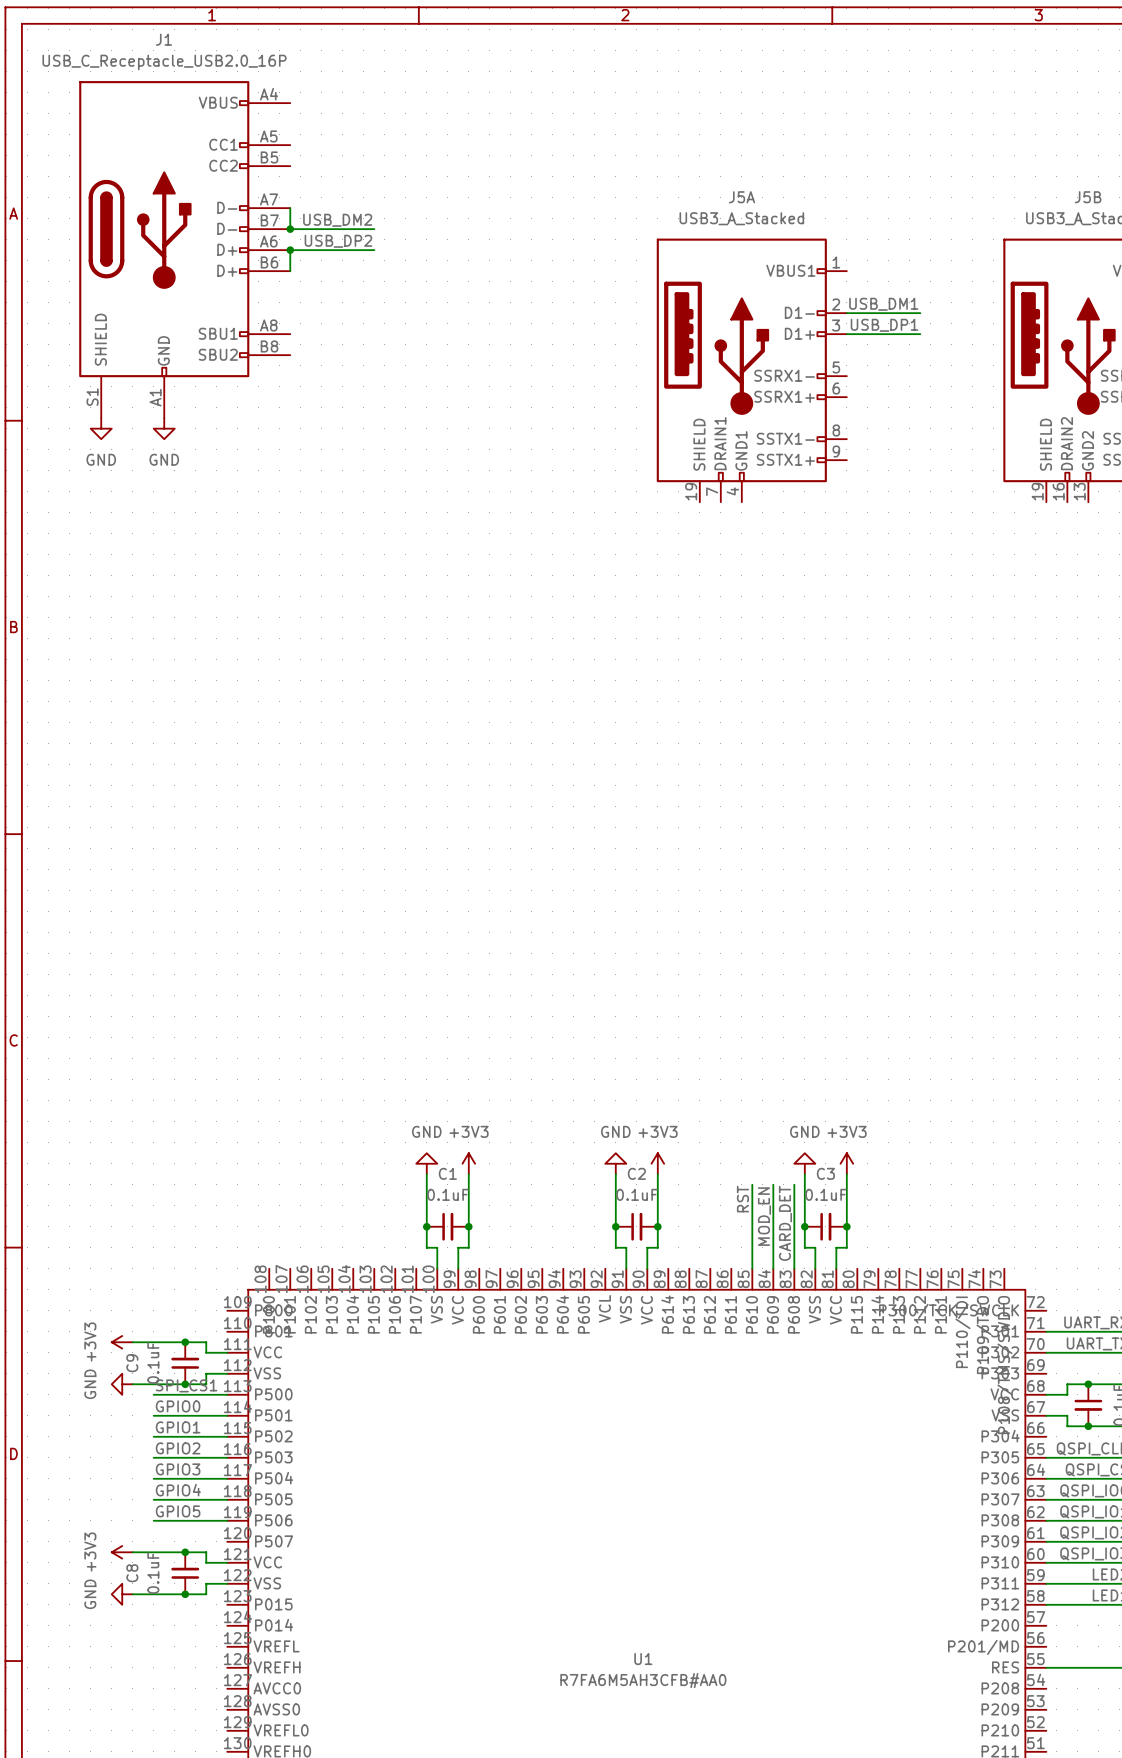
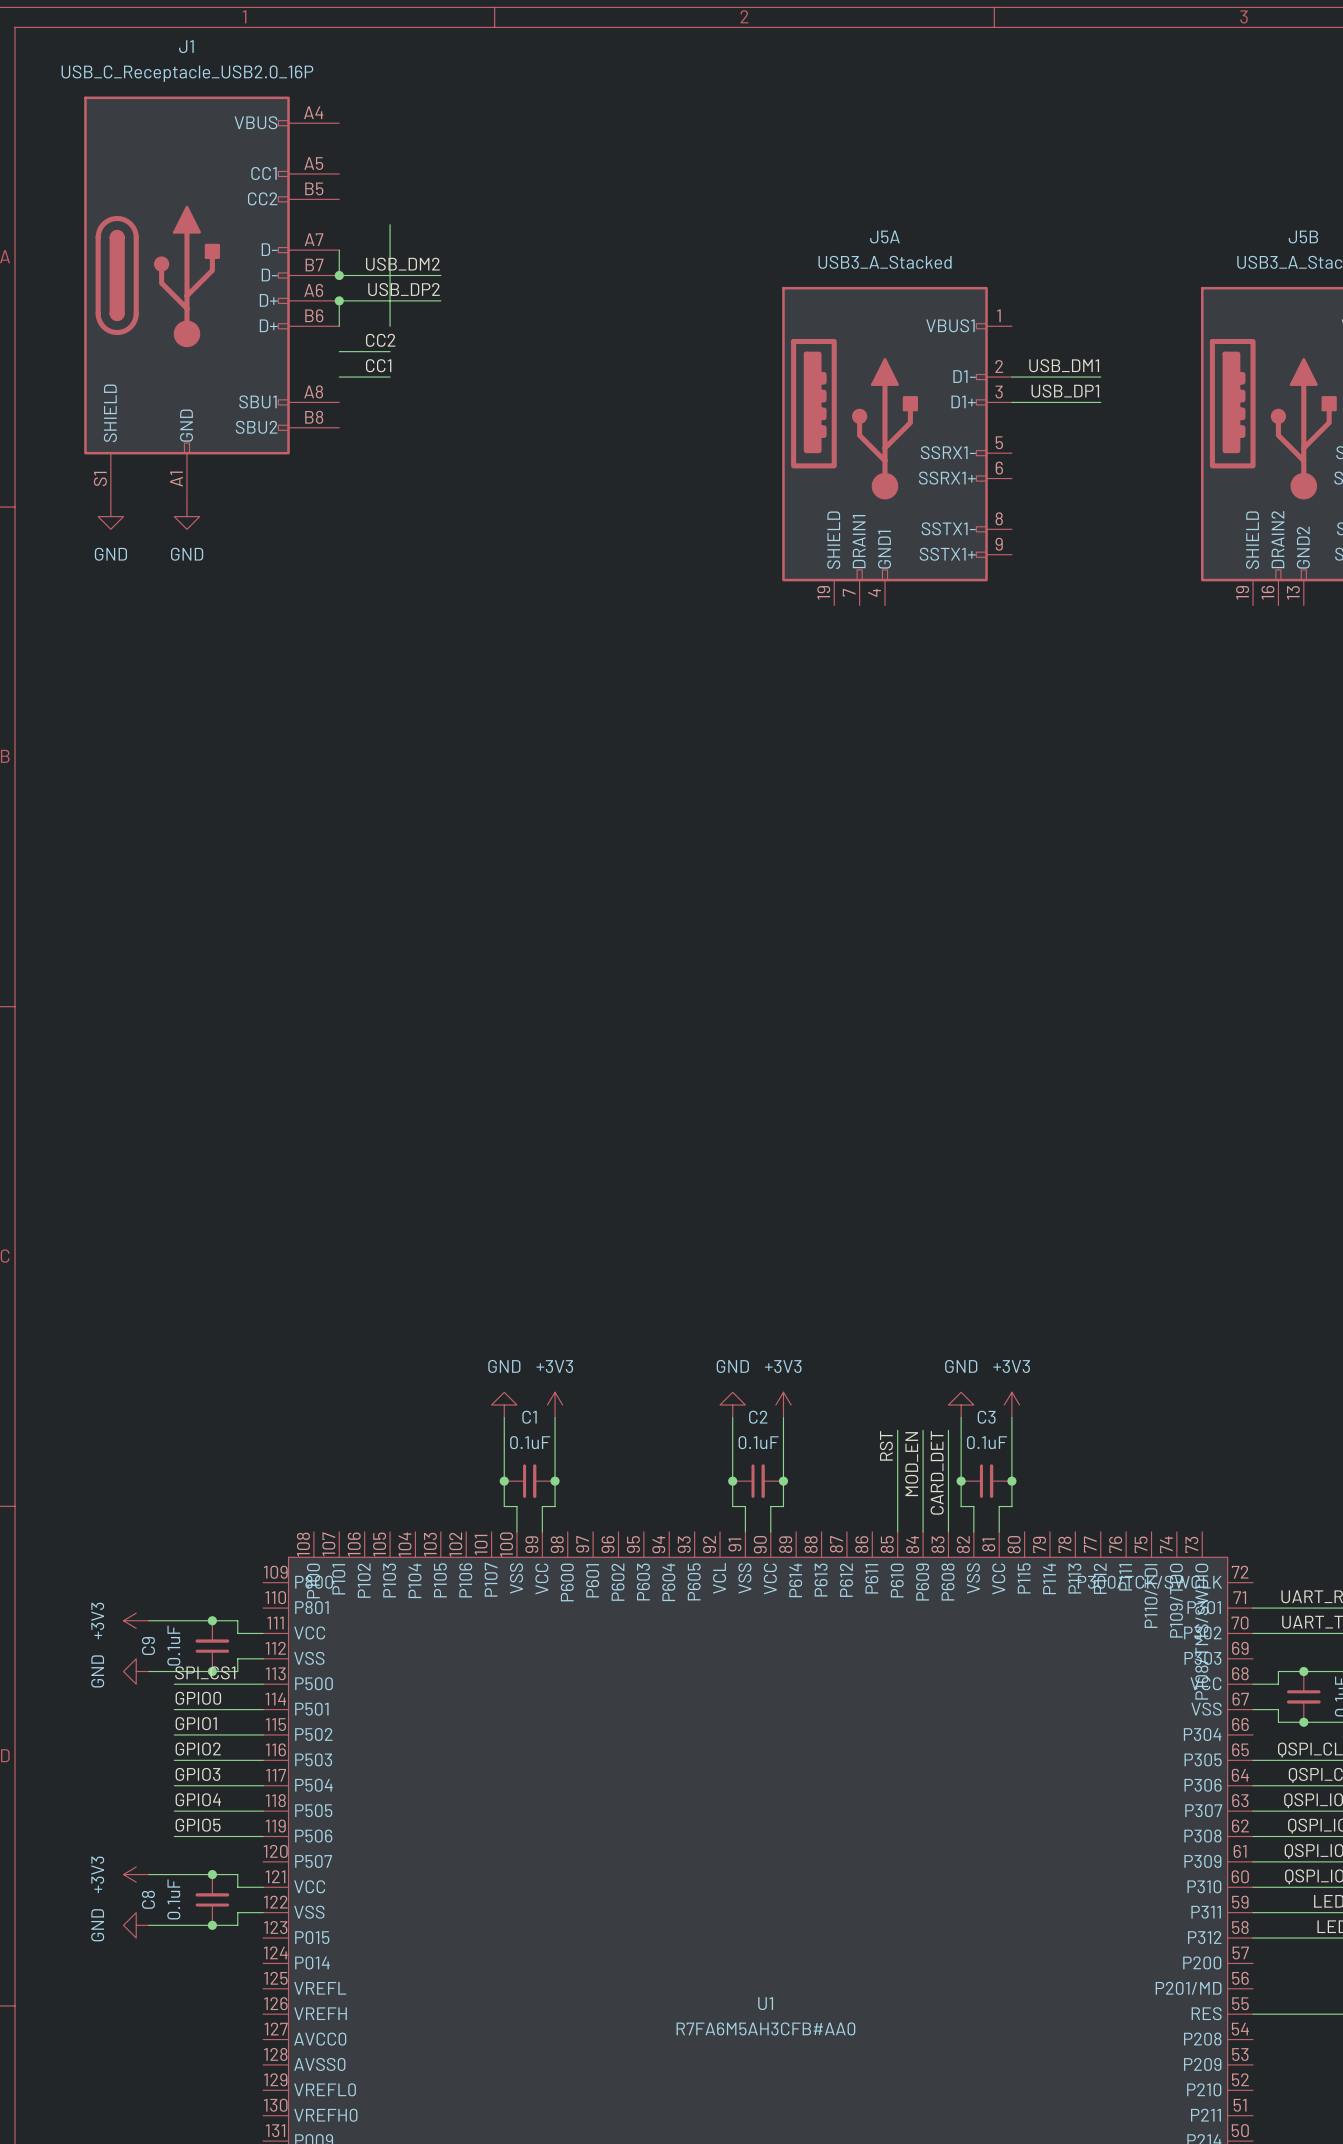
wire: none -> (390, 224) (390, 326)
label: none -> CC2 (380, 340)
wire: none -> (339, 351) (390, 351)
label: none -> CC1 (378, 365)
wire: none -> (339, 377) (390, 377)

